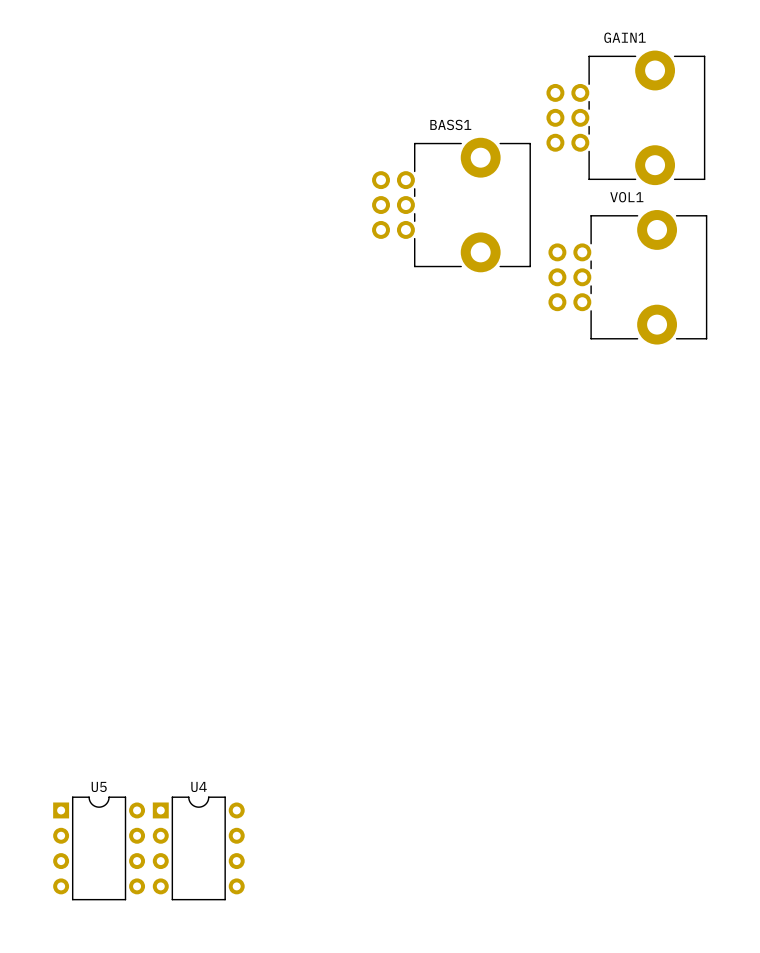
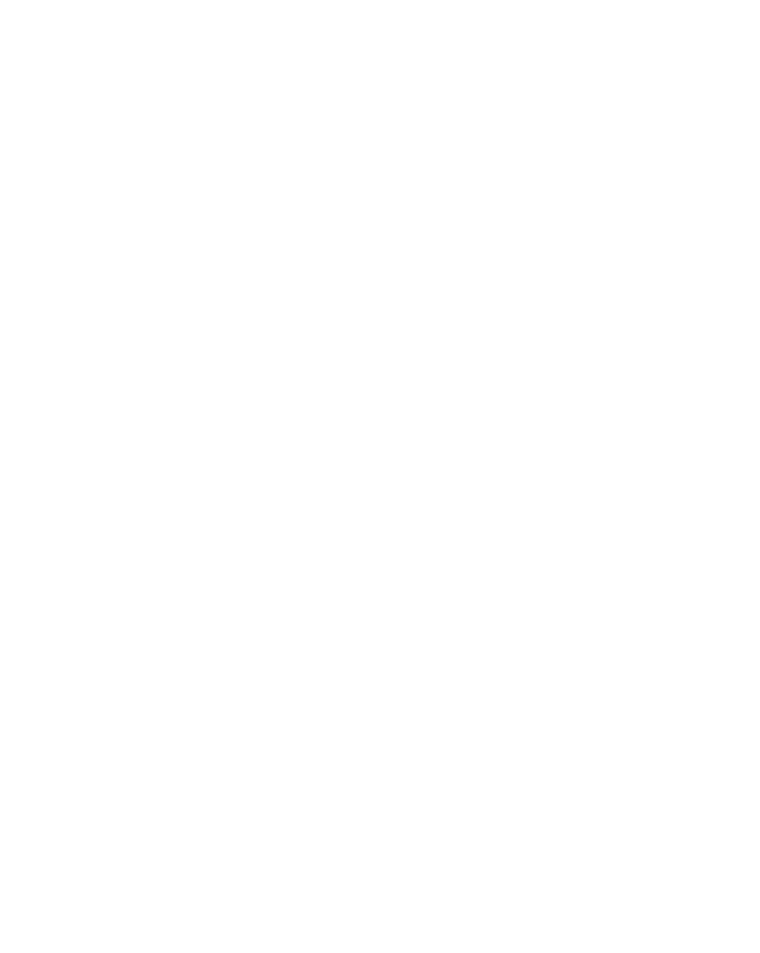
GAIN1: (625, 117) -> none
BASS1: (451, 205) -> none
VOL1: (627, 277) -> none
U5: (99, 848) -> none
U4: (198, 848) -> none

